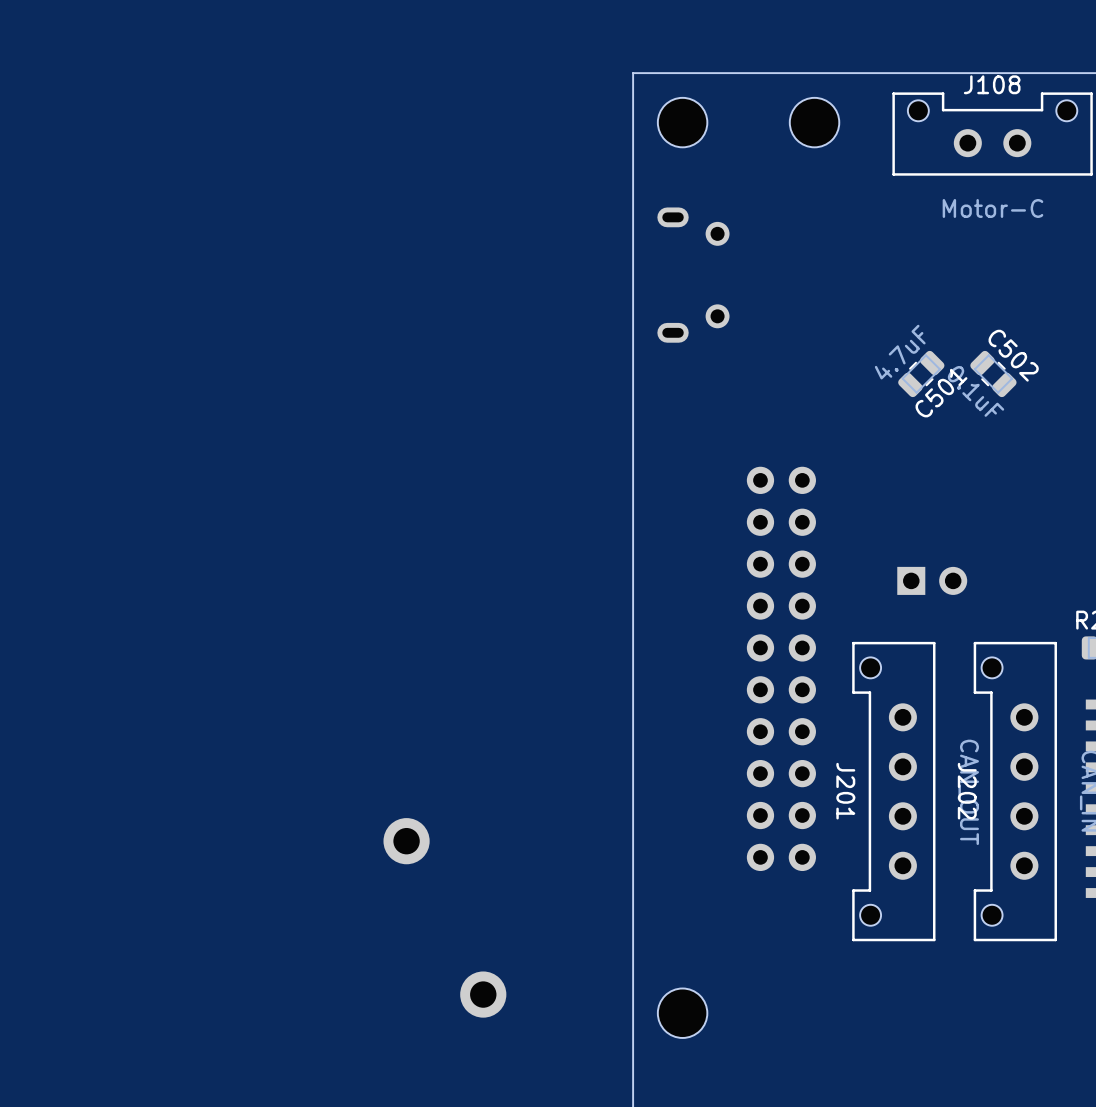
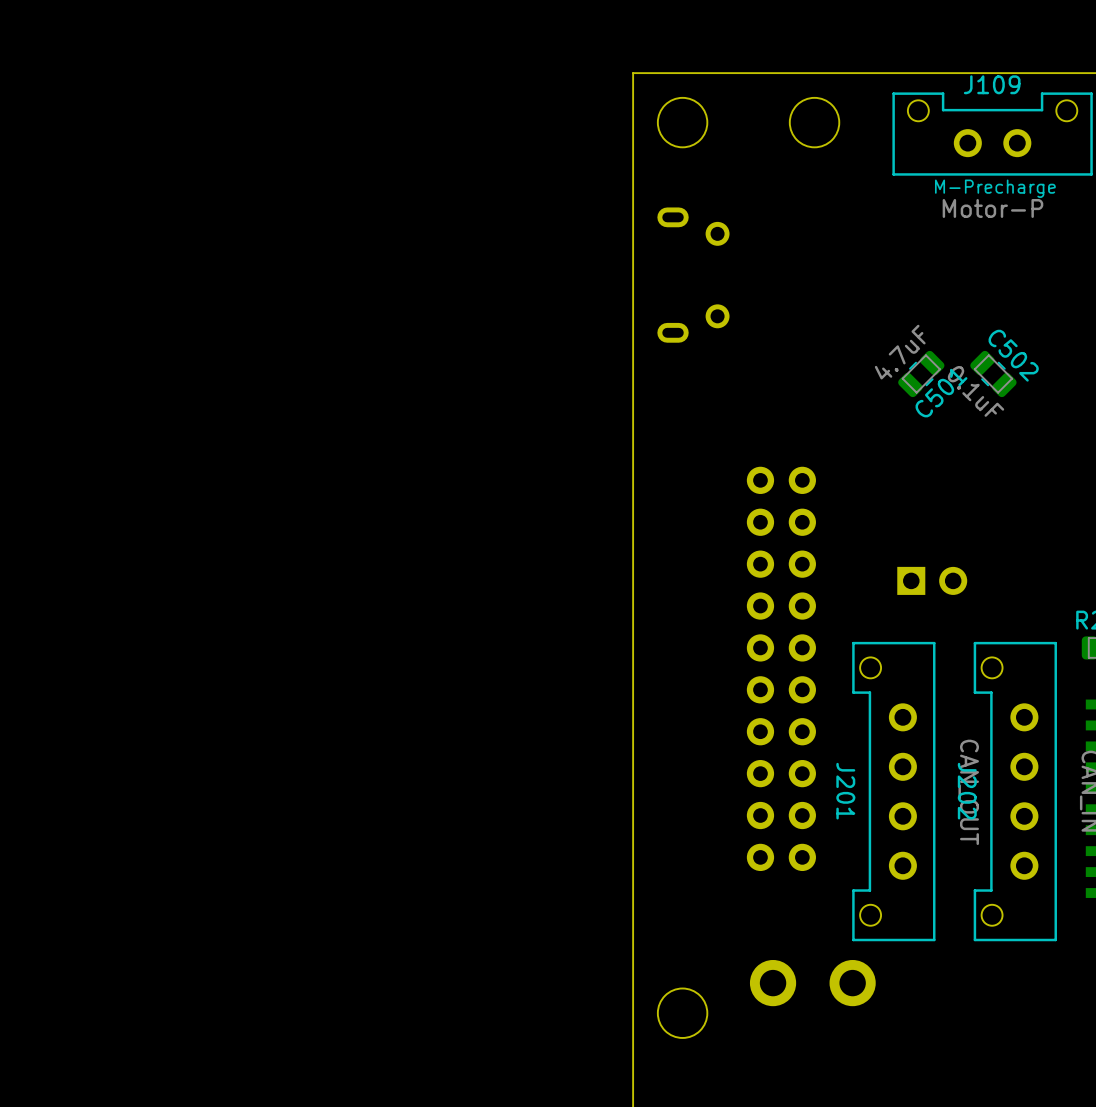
J108 name: J108 (992, 84) -> J109 (992, 84)
text: none -> M-Precharge (995, 188)
J108 value: Motor-C (992, 208) -> Motor-P (992, 208)
part: (406, 841) -> none
part: none -> (773, 983)
part: none -> (852, 983)
part: (483, 994) -> none

